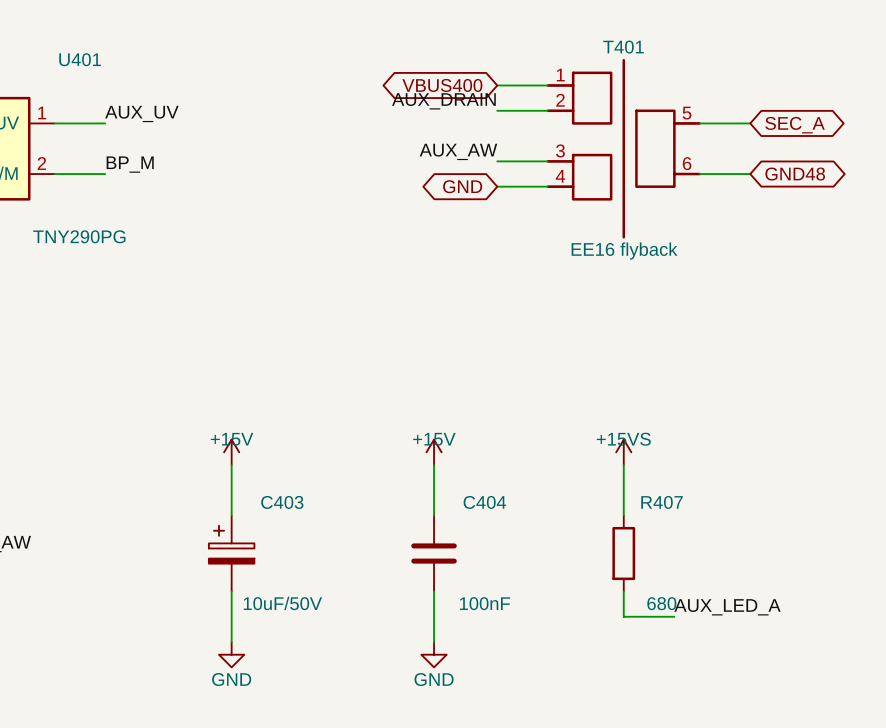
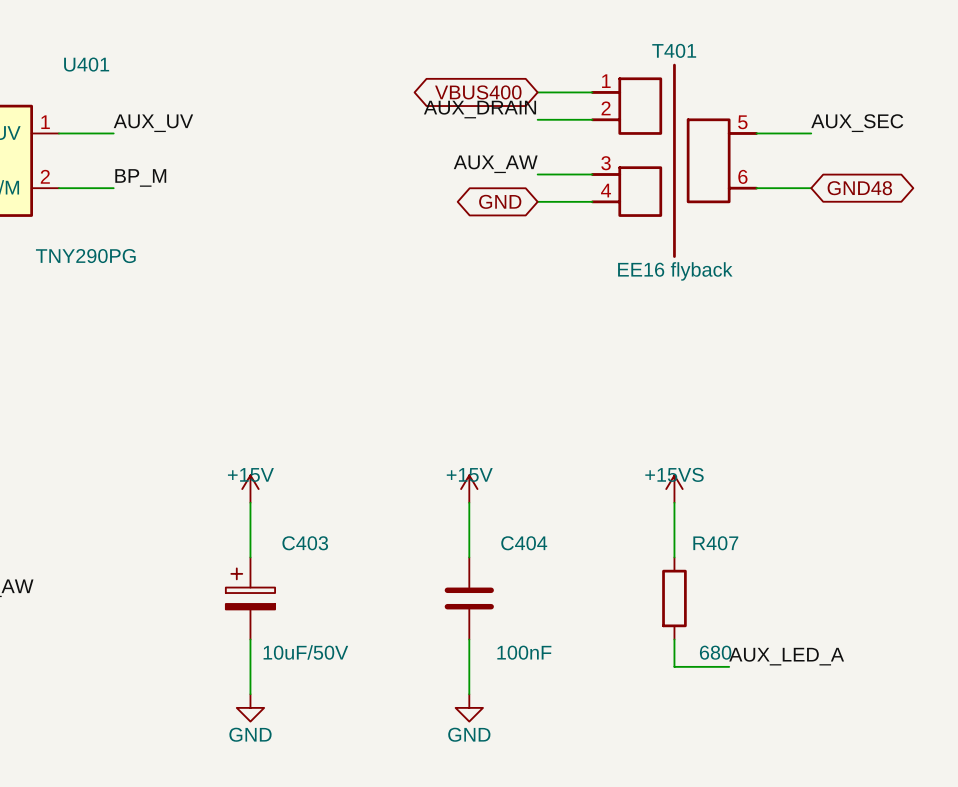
label: none -> AUX_SEC (857, 123)
global label: SEC_A (795, 125) -> none

